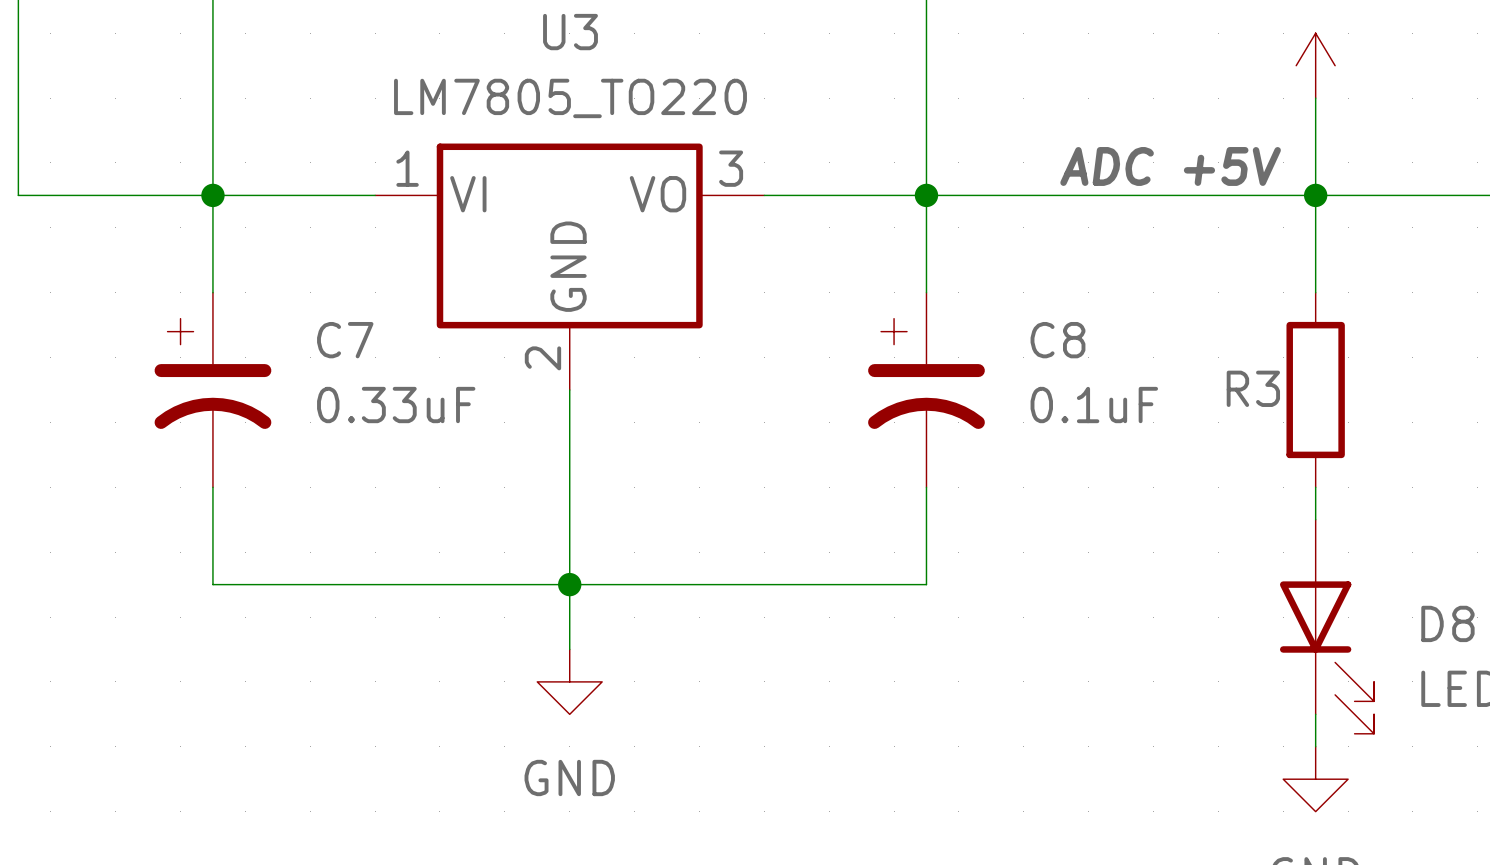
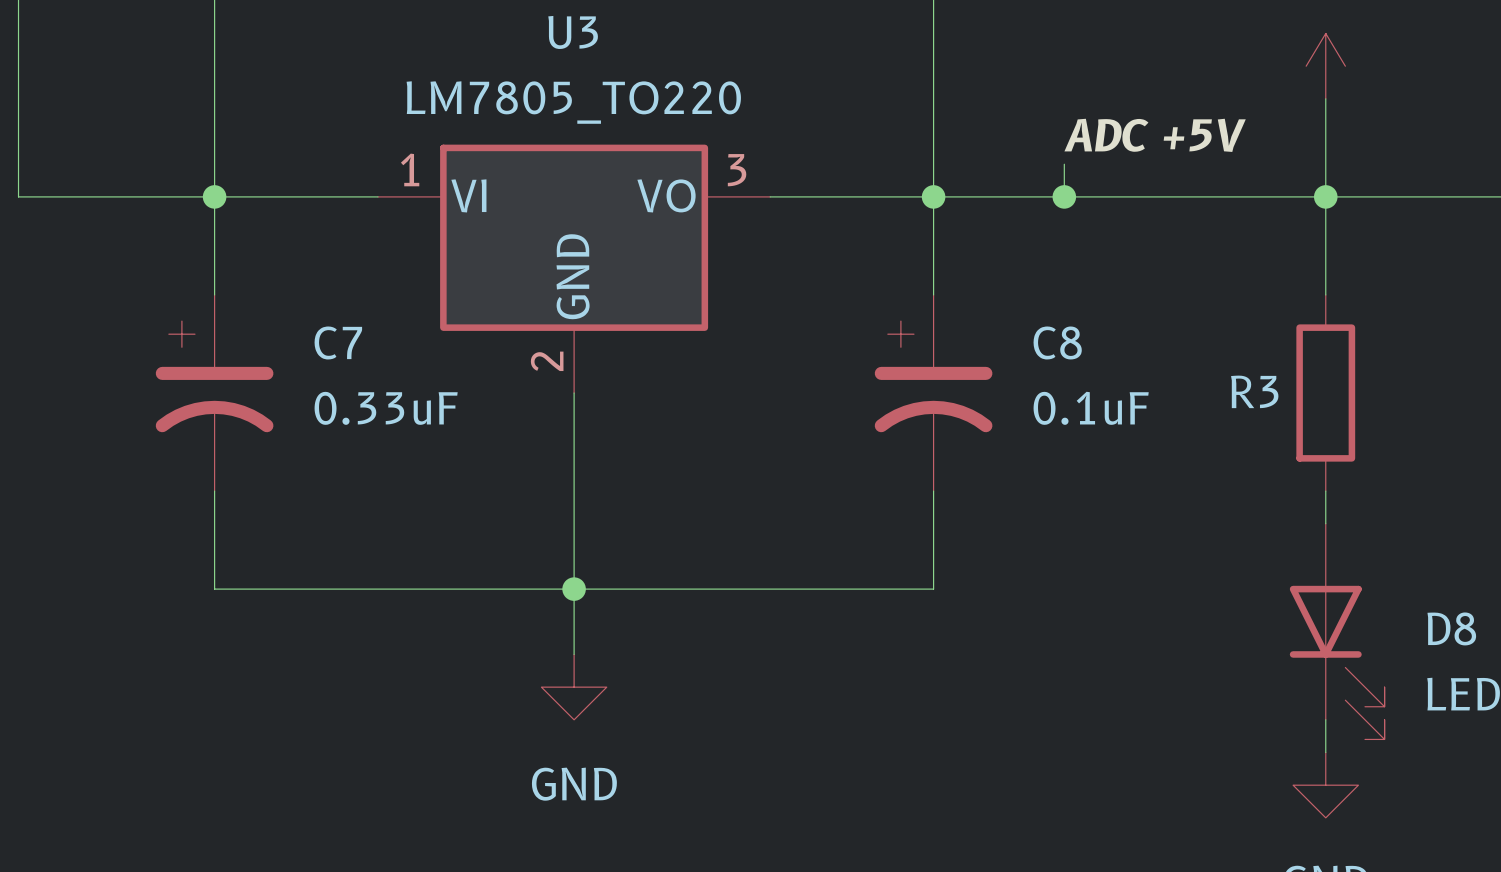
wire: none -> (1064, 164) (1064, 196)
label position: ADC +5V (1170, 166) -> ADC +5V (1155, 135)
junction: none -> (1064, 196)

